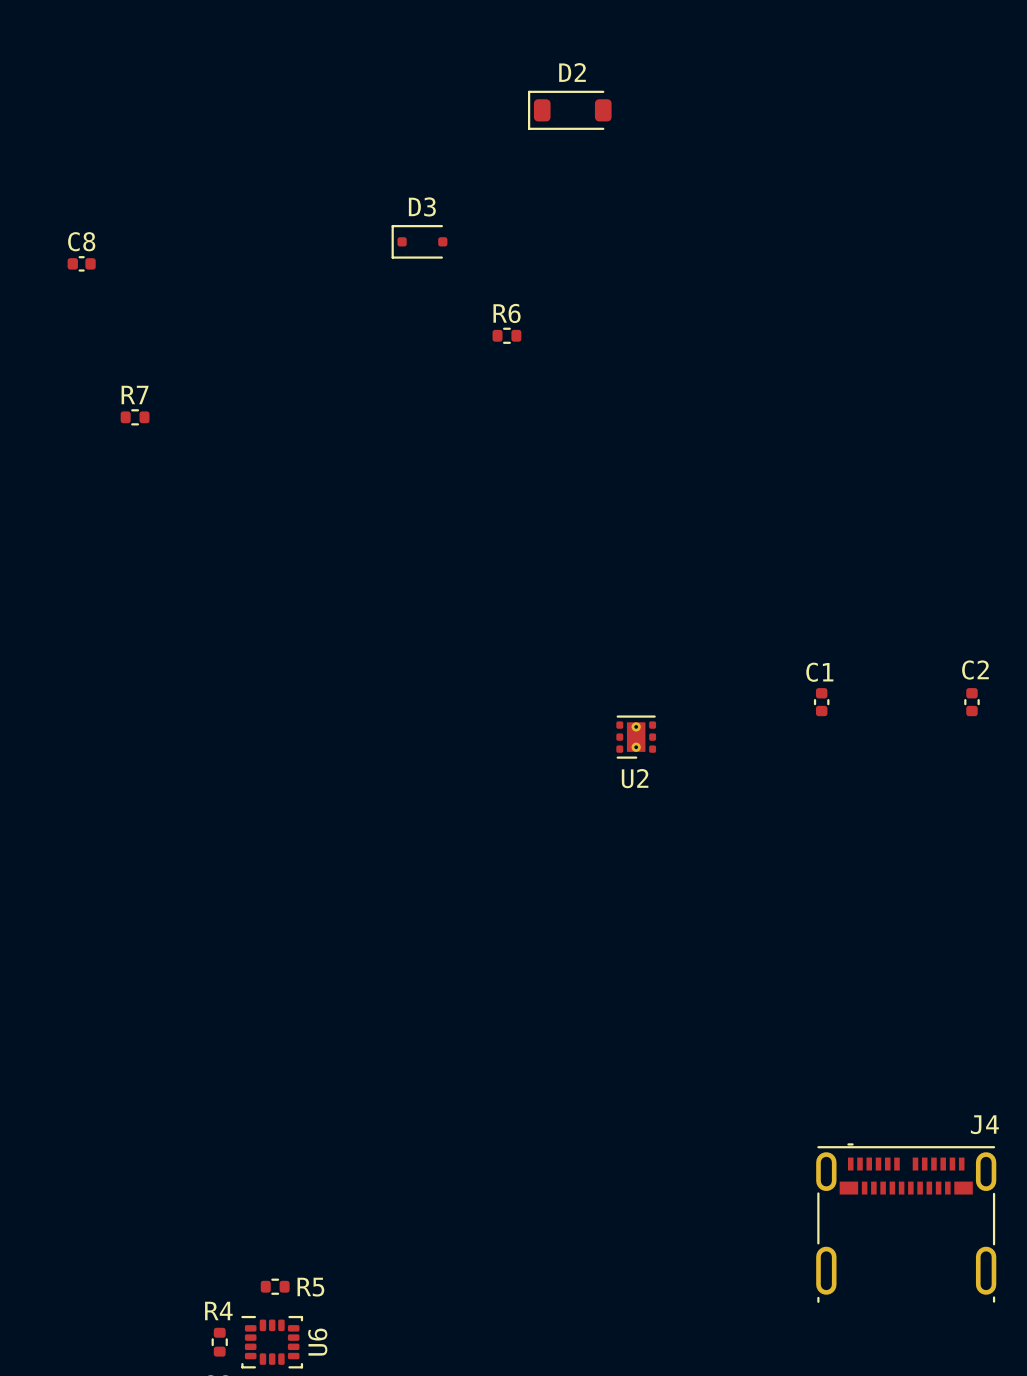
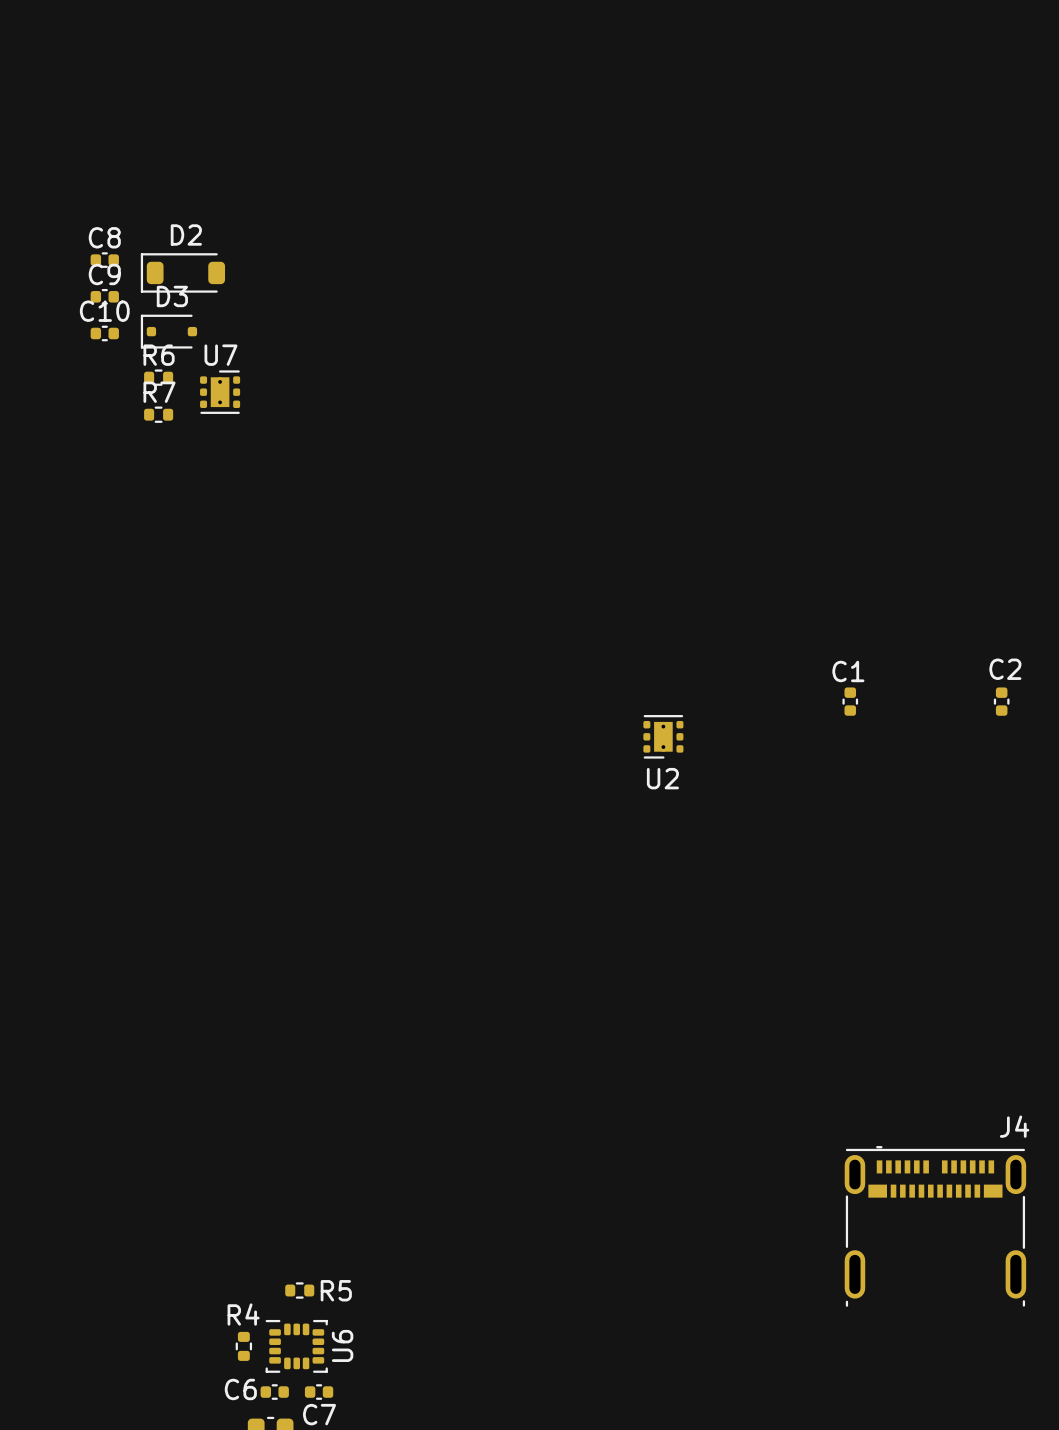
D2 position: (569, 110) -> (182, 272)
D3 position: (419, 241) -> (168, 331)
C9: none -> (104, 296)
R6 position: (506, 335) -> (158, 377)
C10: none -> (104, 333)
U7: none -> (220, 392)

